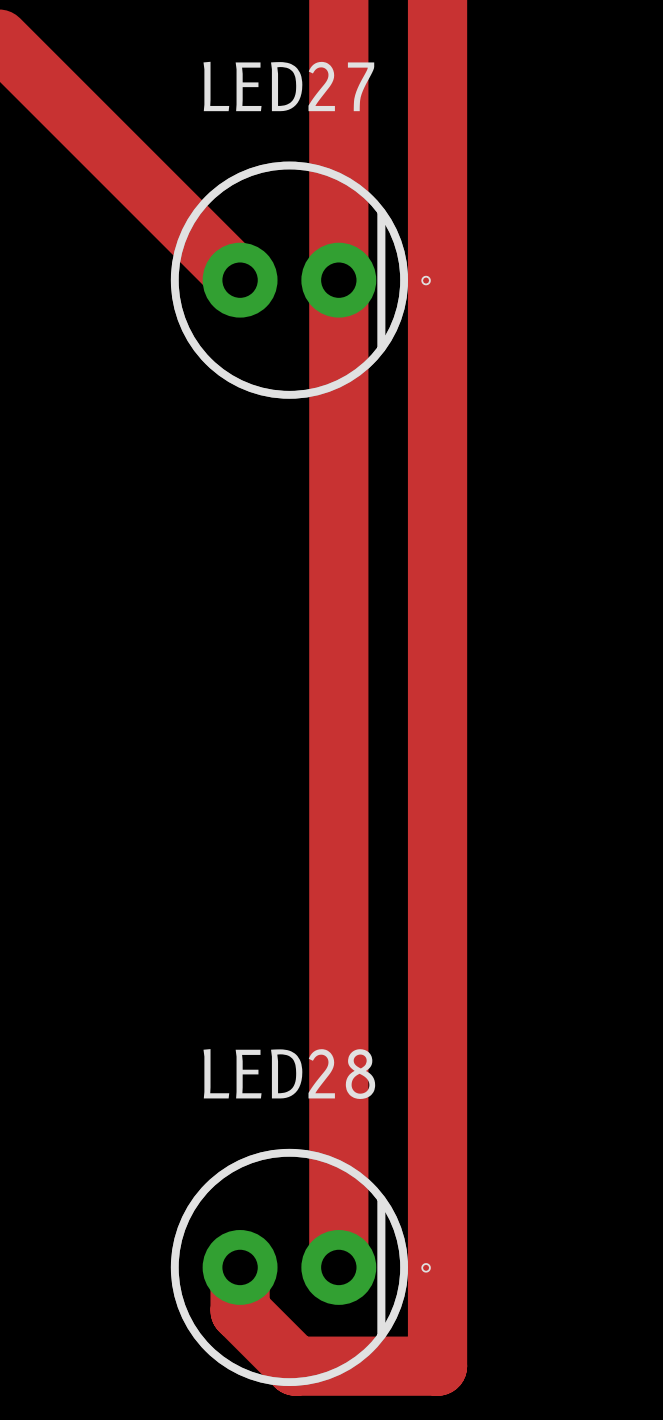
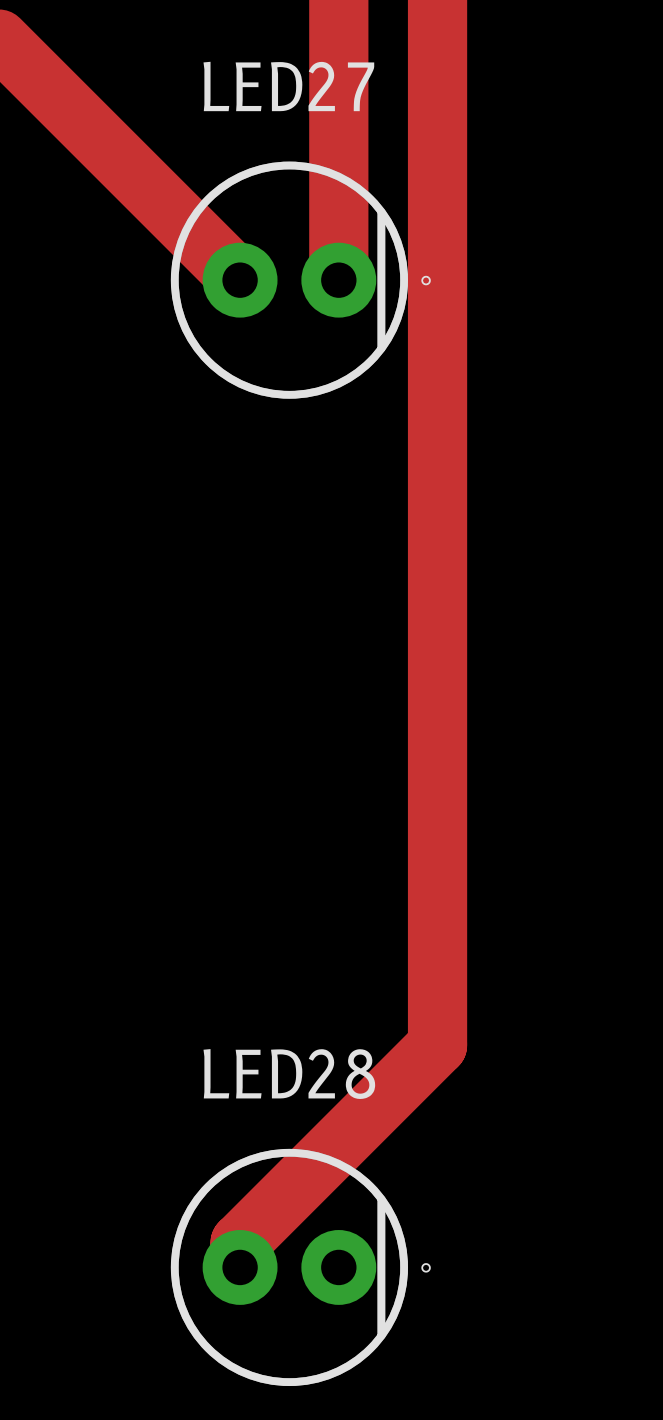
track: (338, 280) (338, 1267) -> none
track: (437, 1045) (437, 1366) (295, 1366) (240, 1310) (240, 1267) -> (437, 1045) (240, 1242) (240, 1267)

